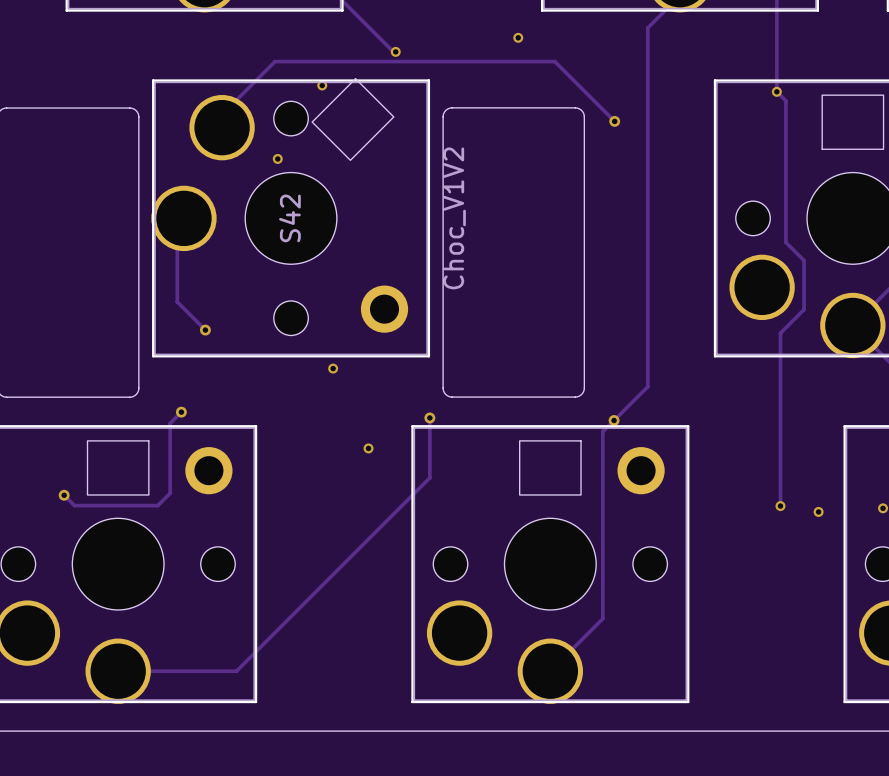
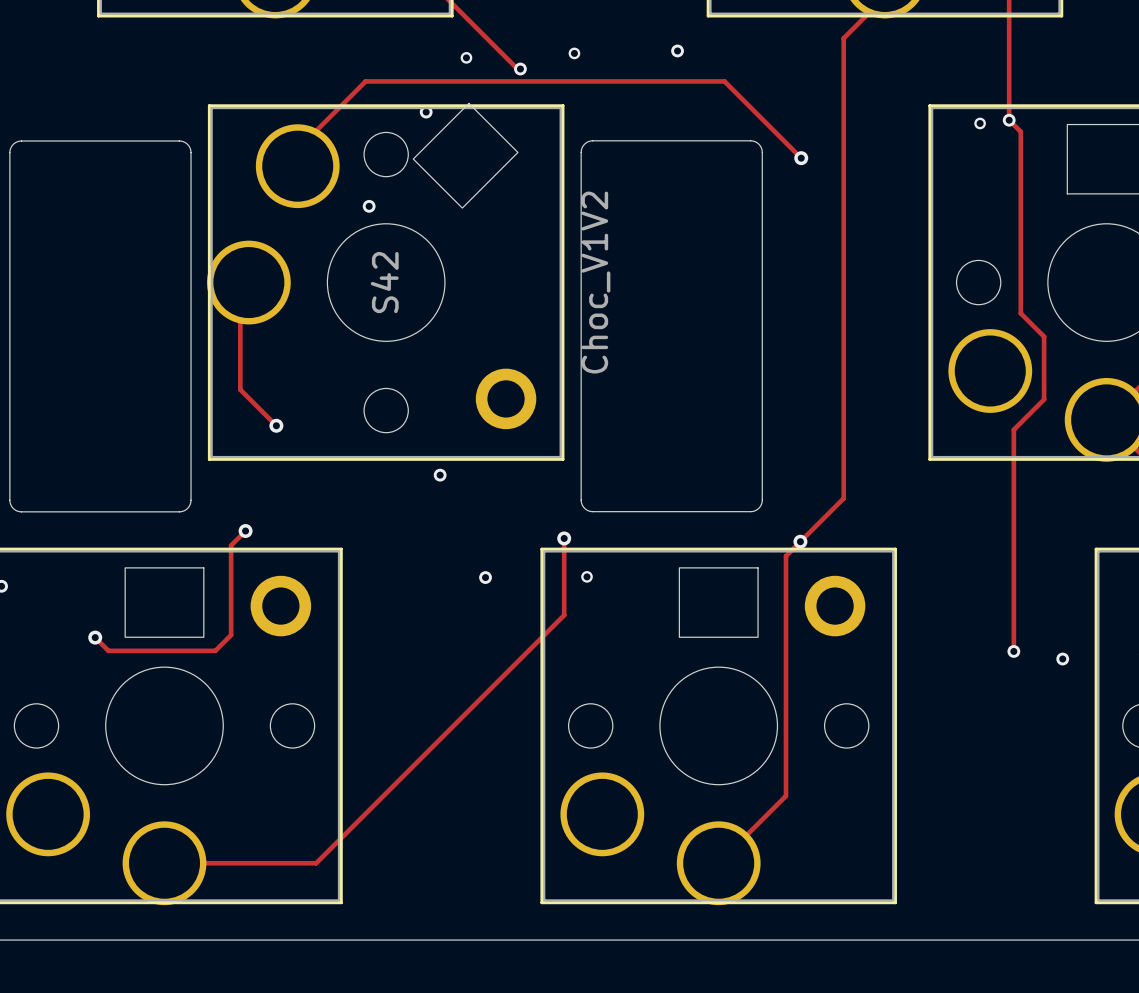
via: none -> (574, 53)
via: none -> (466, 57)
via: none -> (980, 123)
via: none -> (587, 576)

